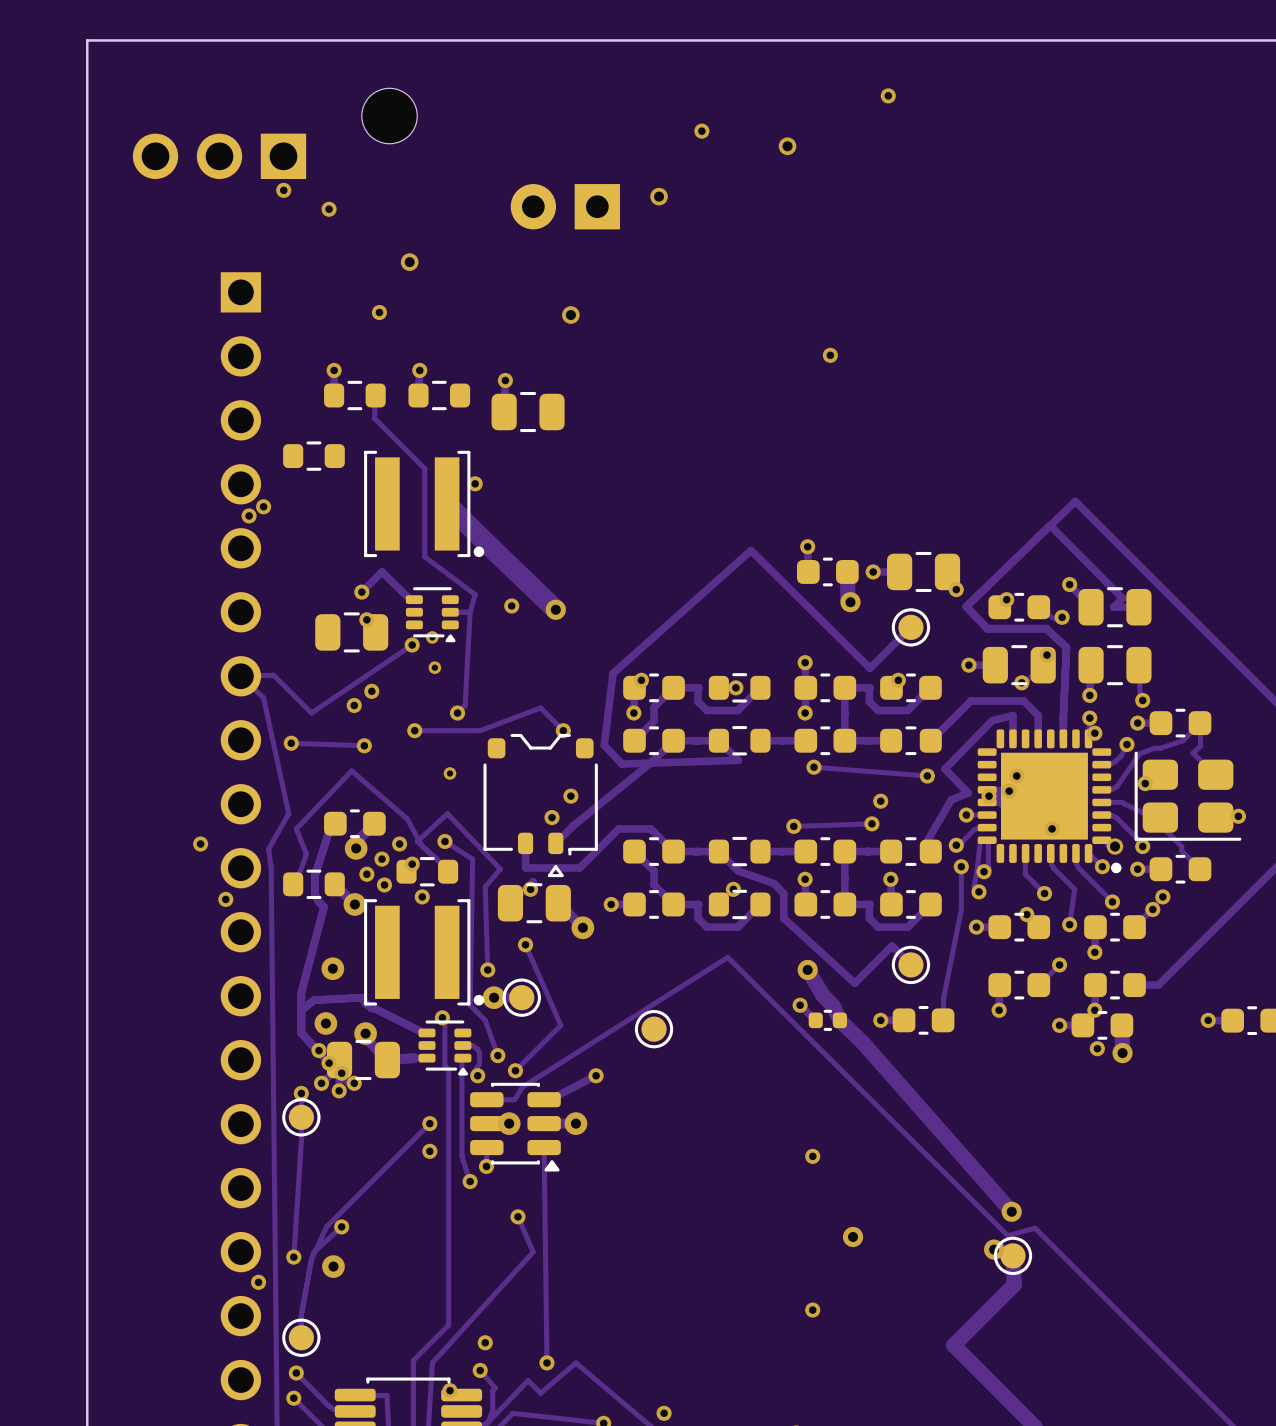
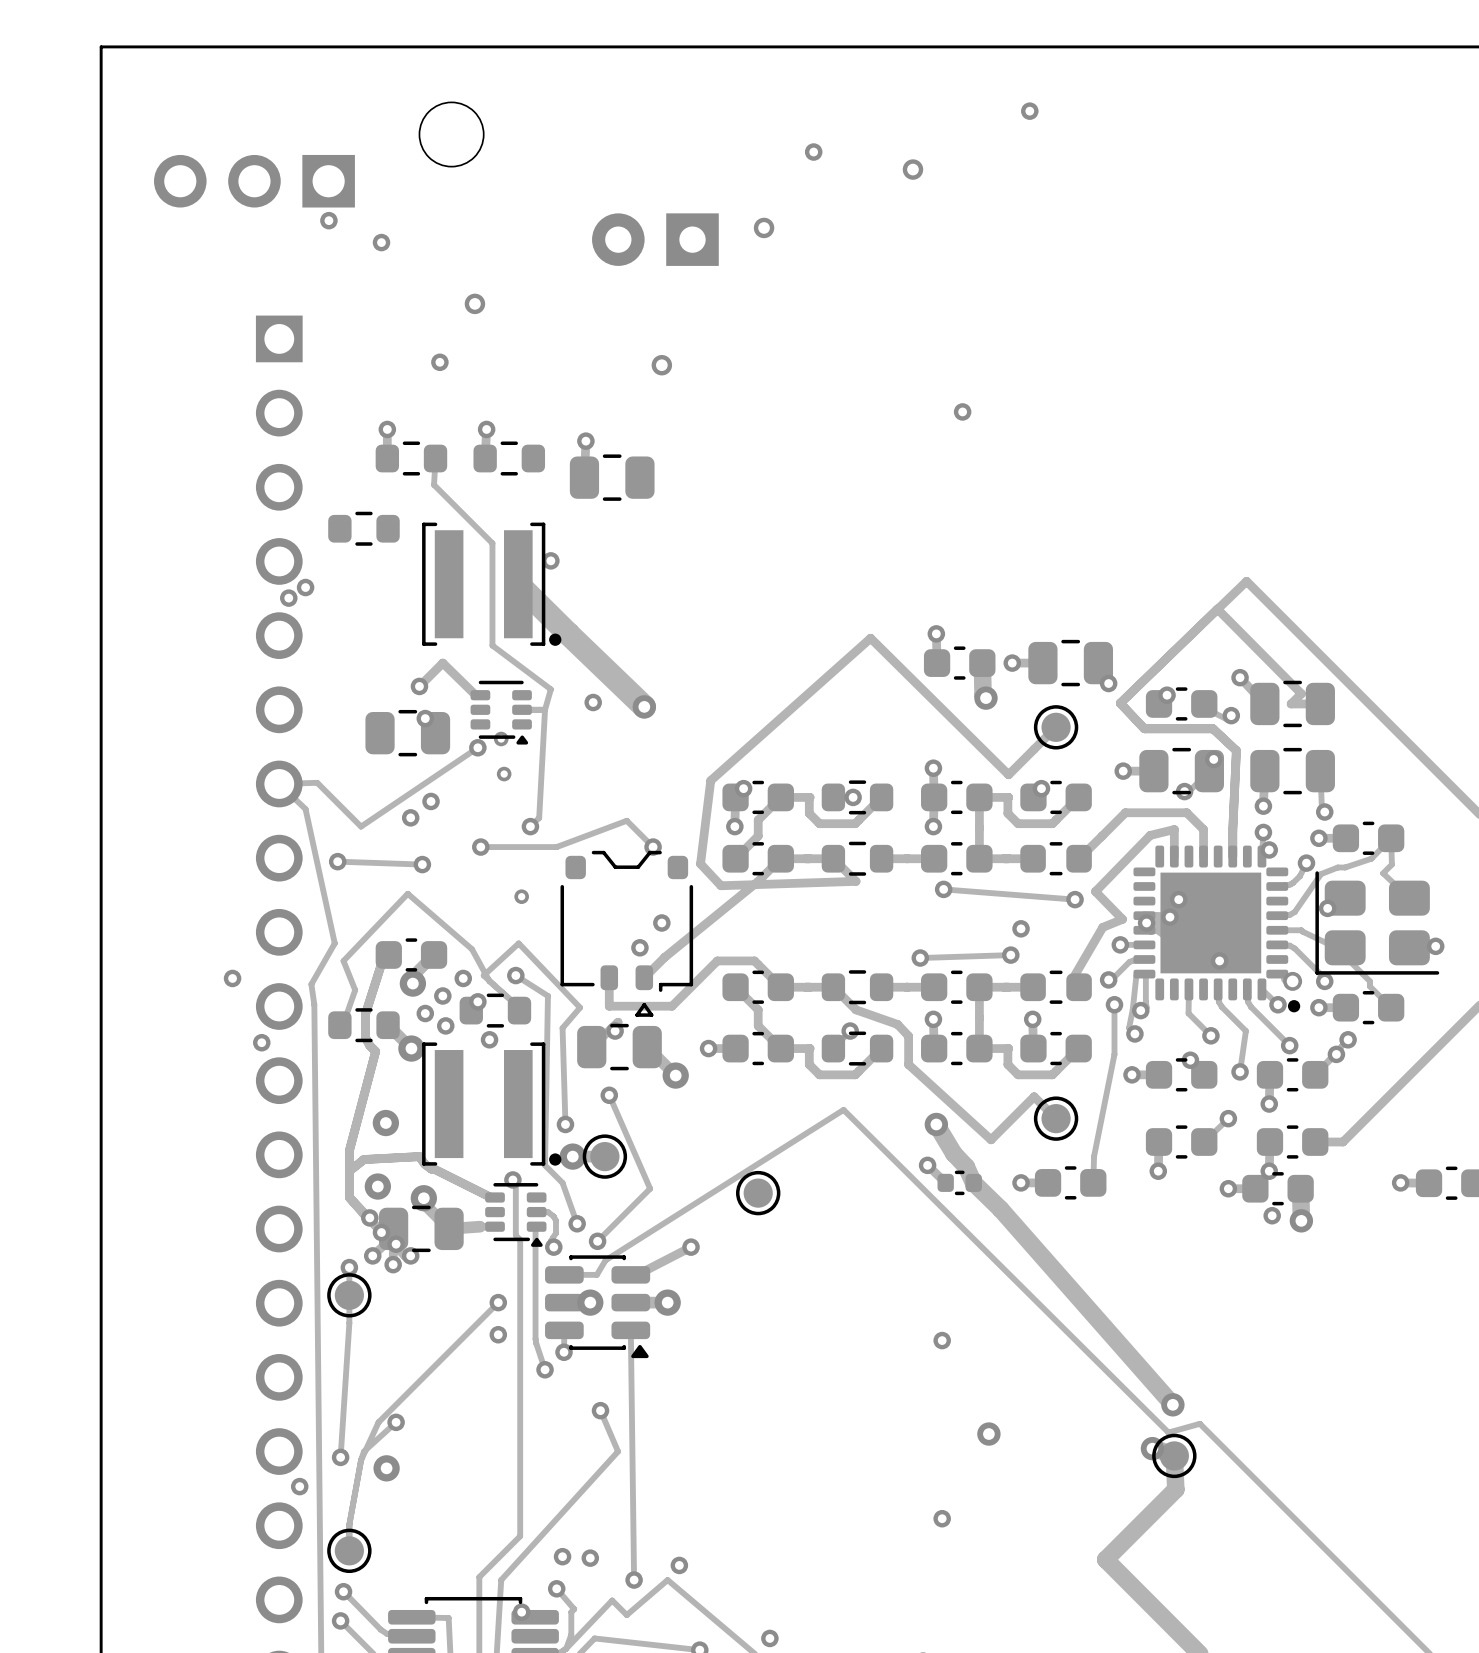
via: none -> (590, 1558)
via: none -> (679, 1565)

